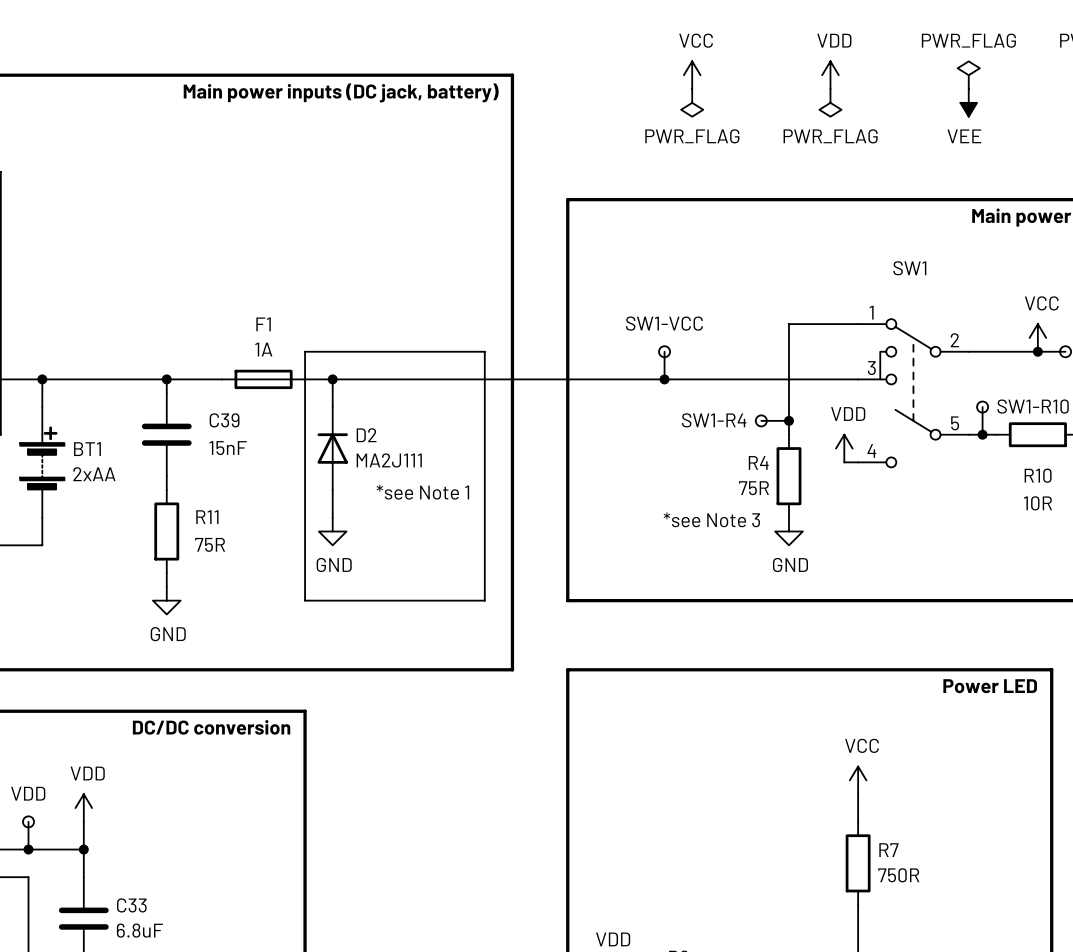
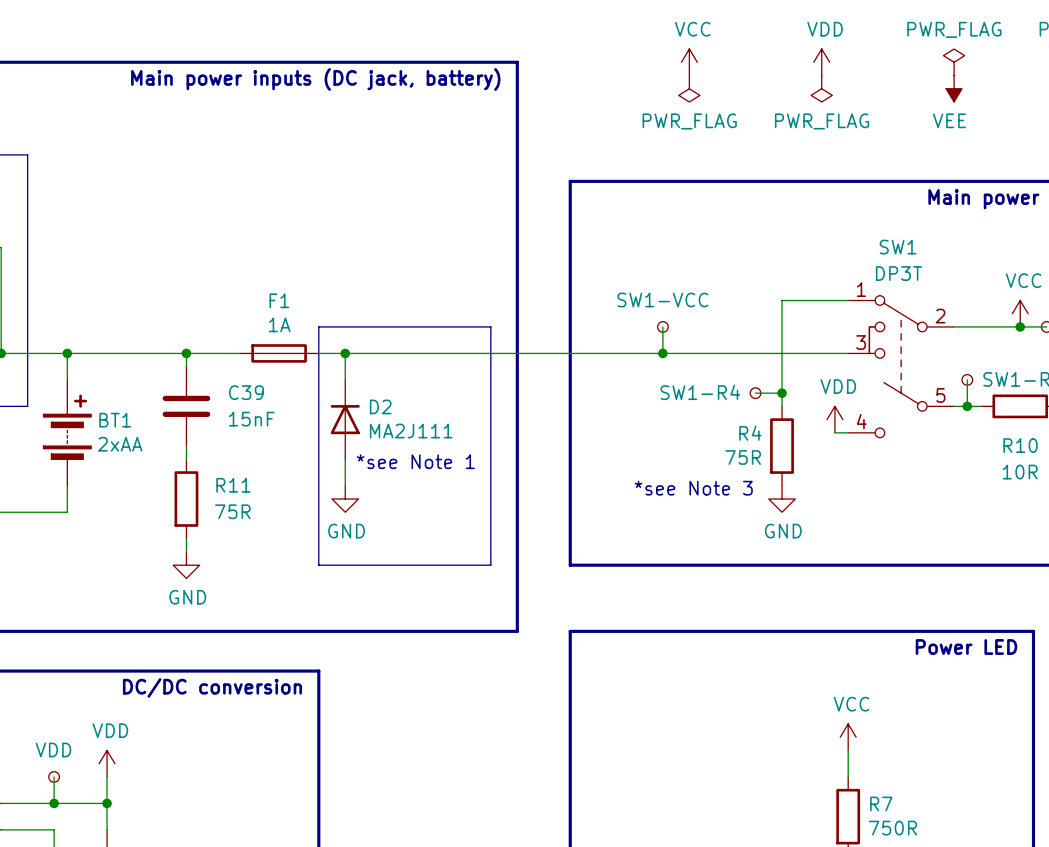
SW1 value: none -> DP3T (899, 273)
BT1 symbol: [20, 407, 65, 518] -> [43, 379, 92, 486]

